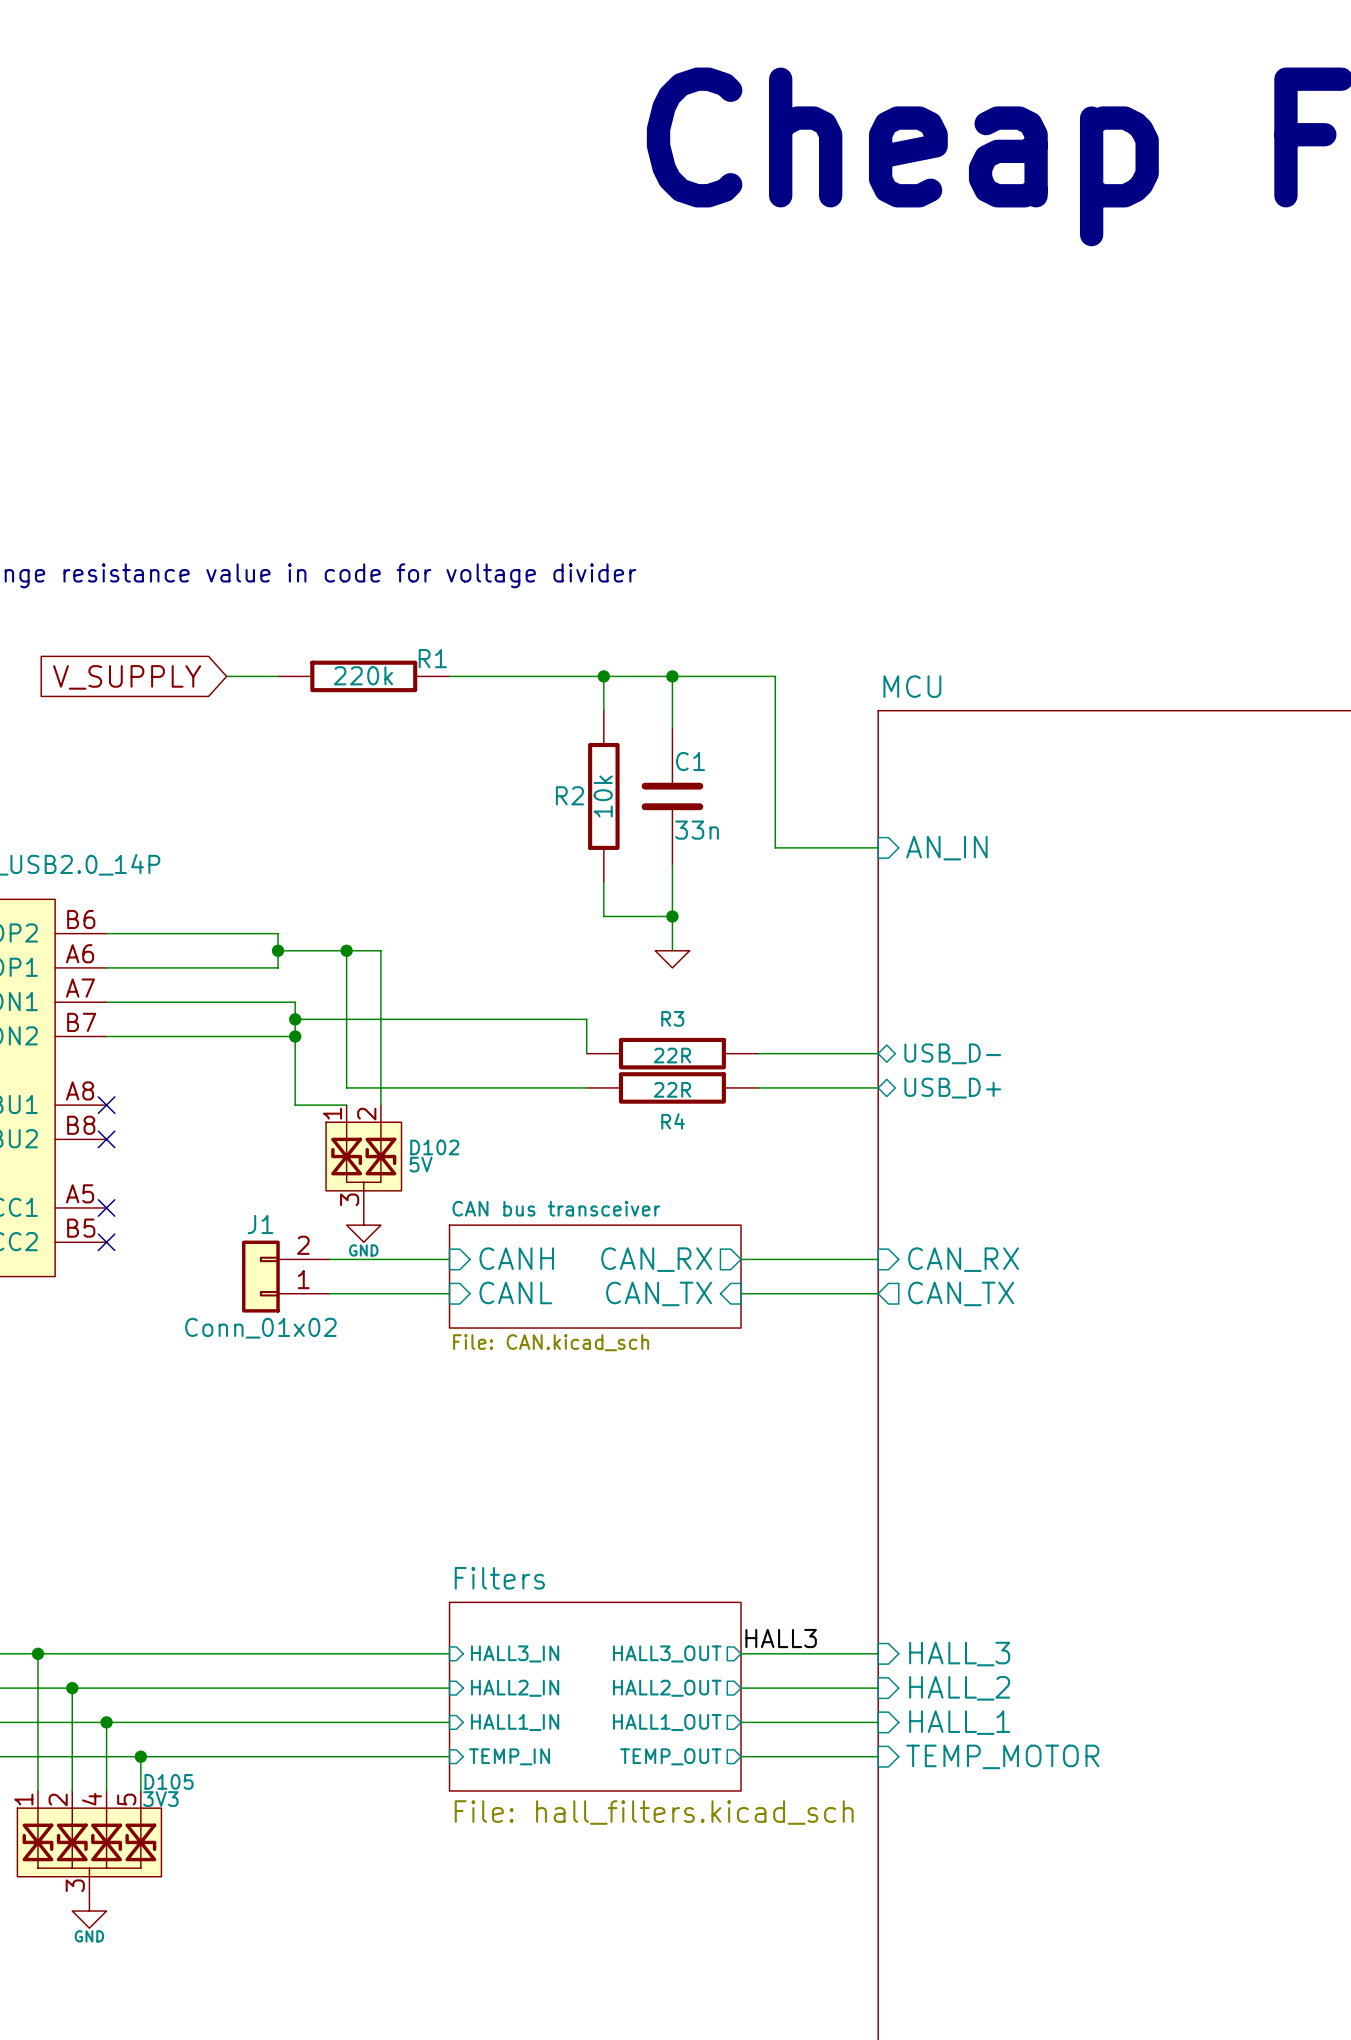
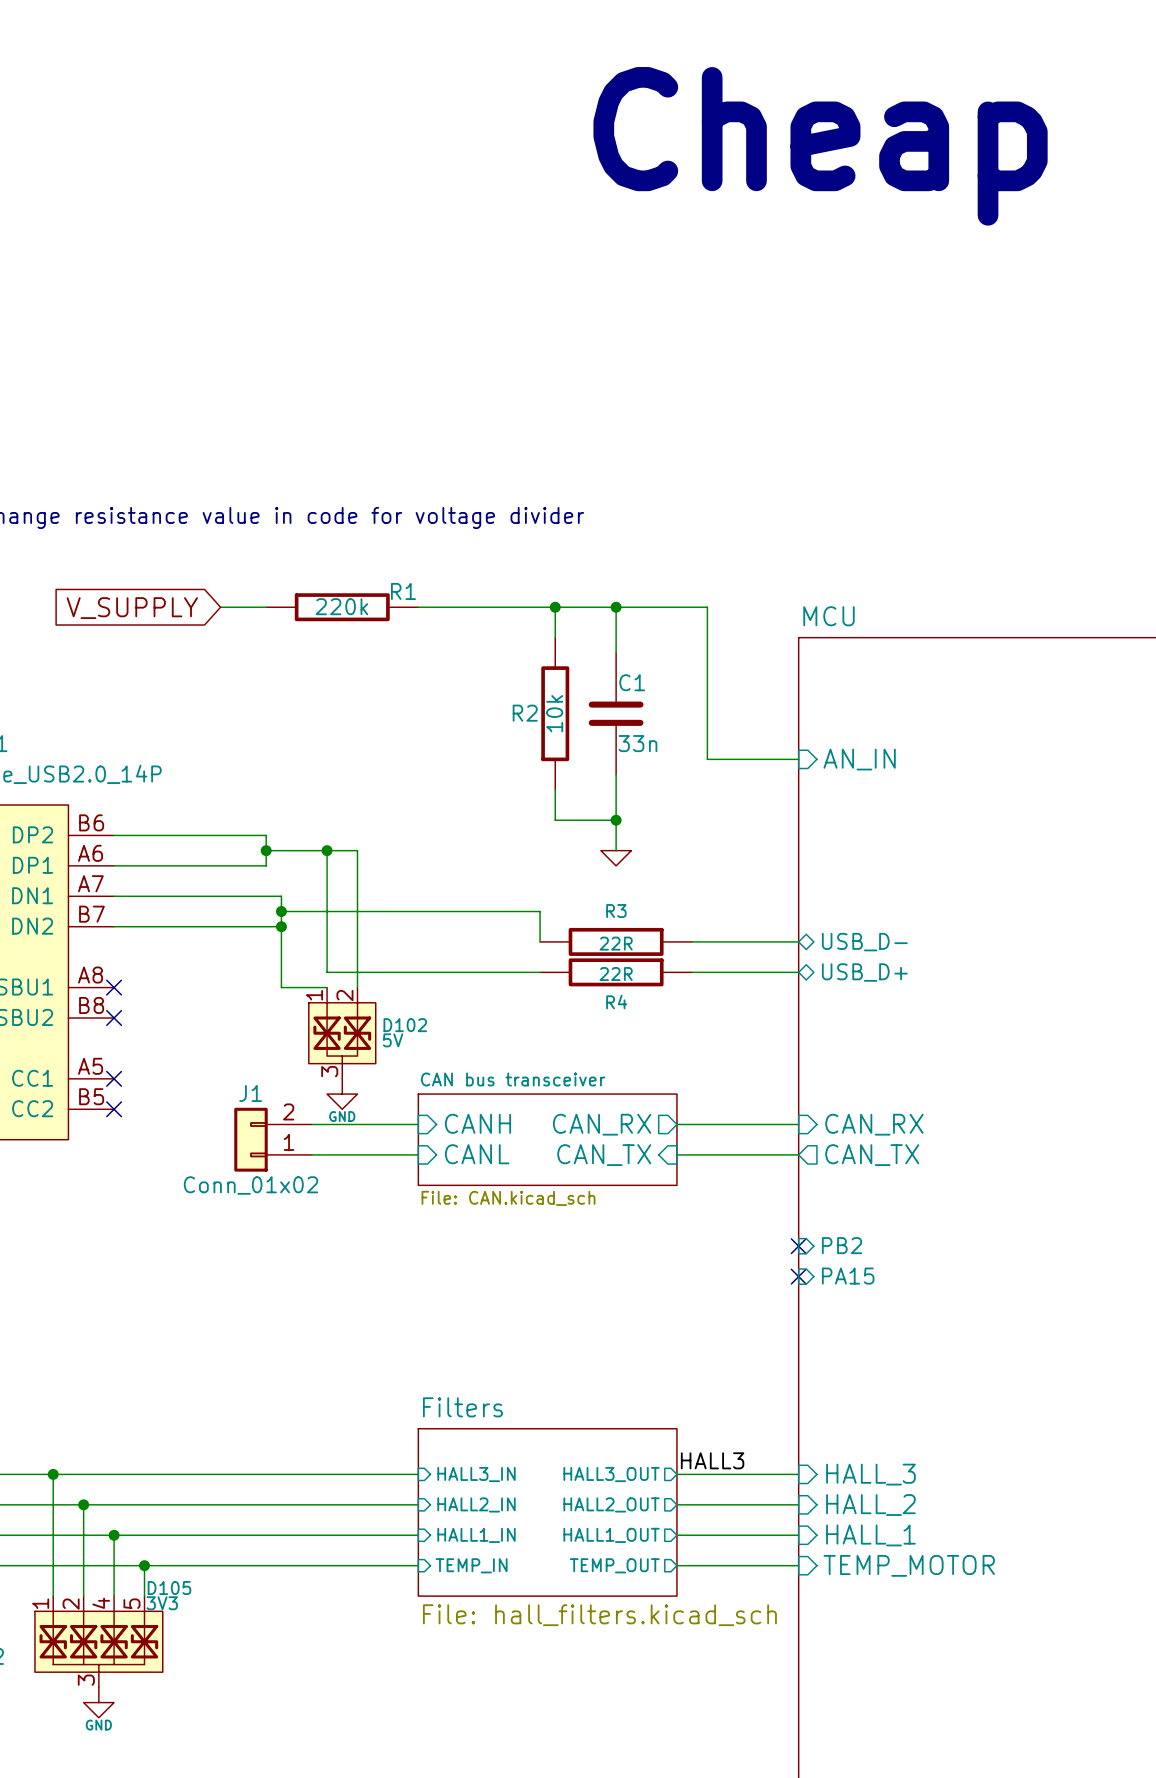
sheet pin: none -> PB2 (842, 1245)
no-connect mark: none -> (798, 1246)
no-connect mark: none -> (798, 1276)
sheet pin: none -> PA15 (848, 1276)

